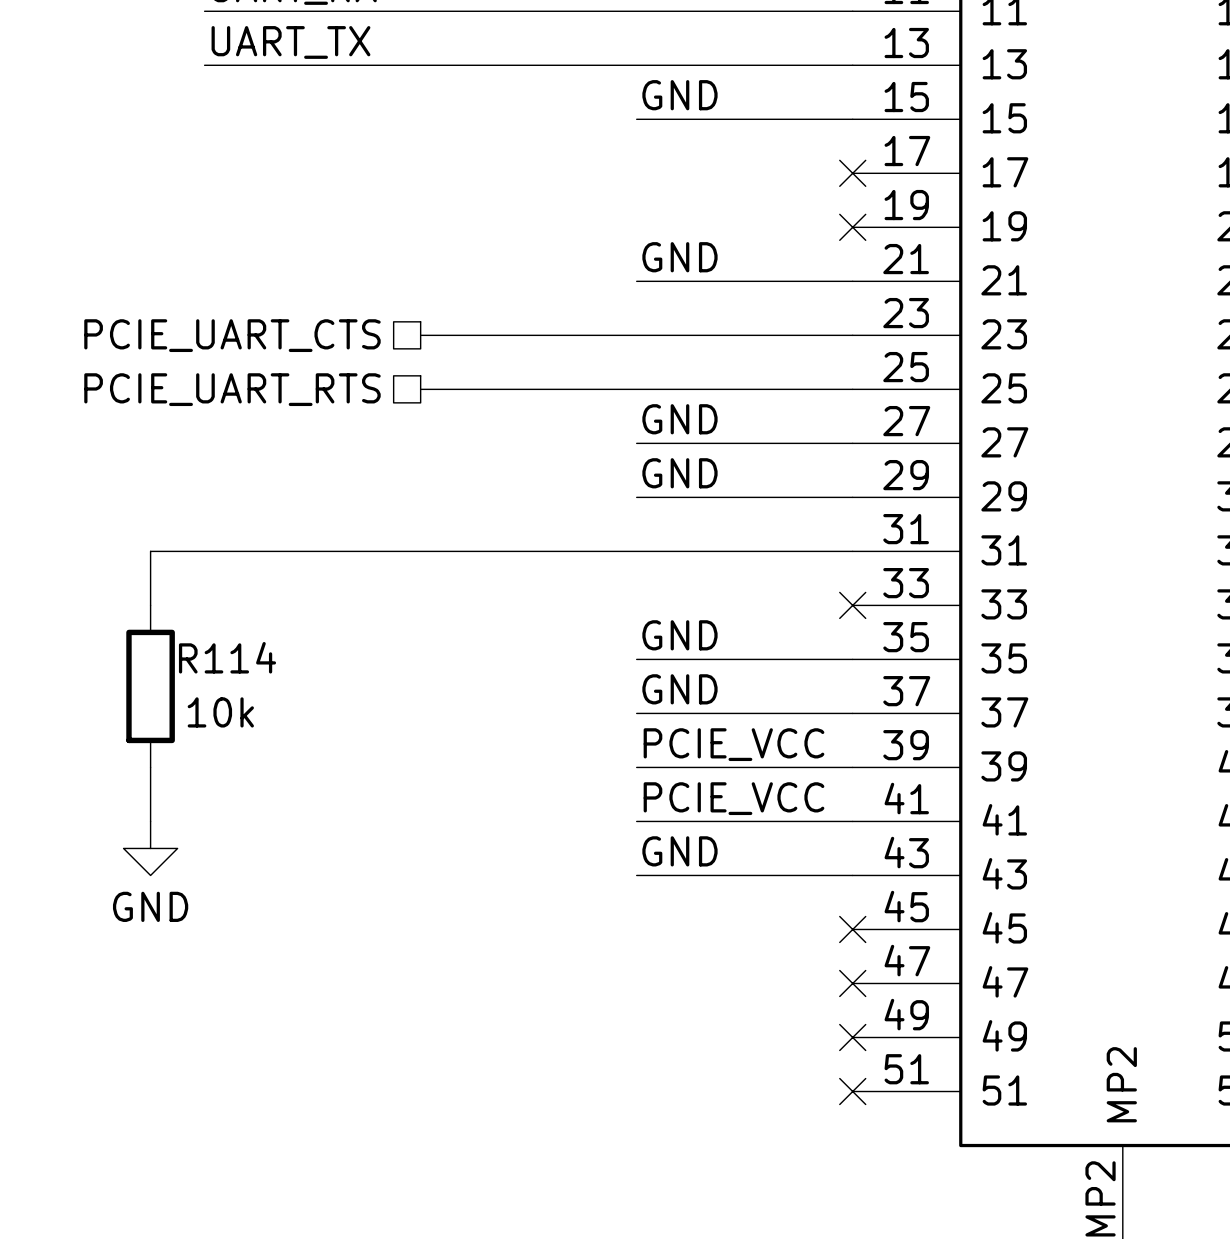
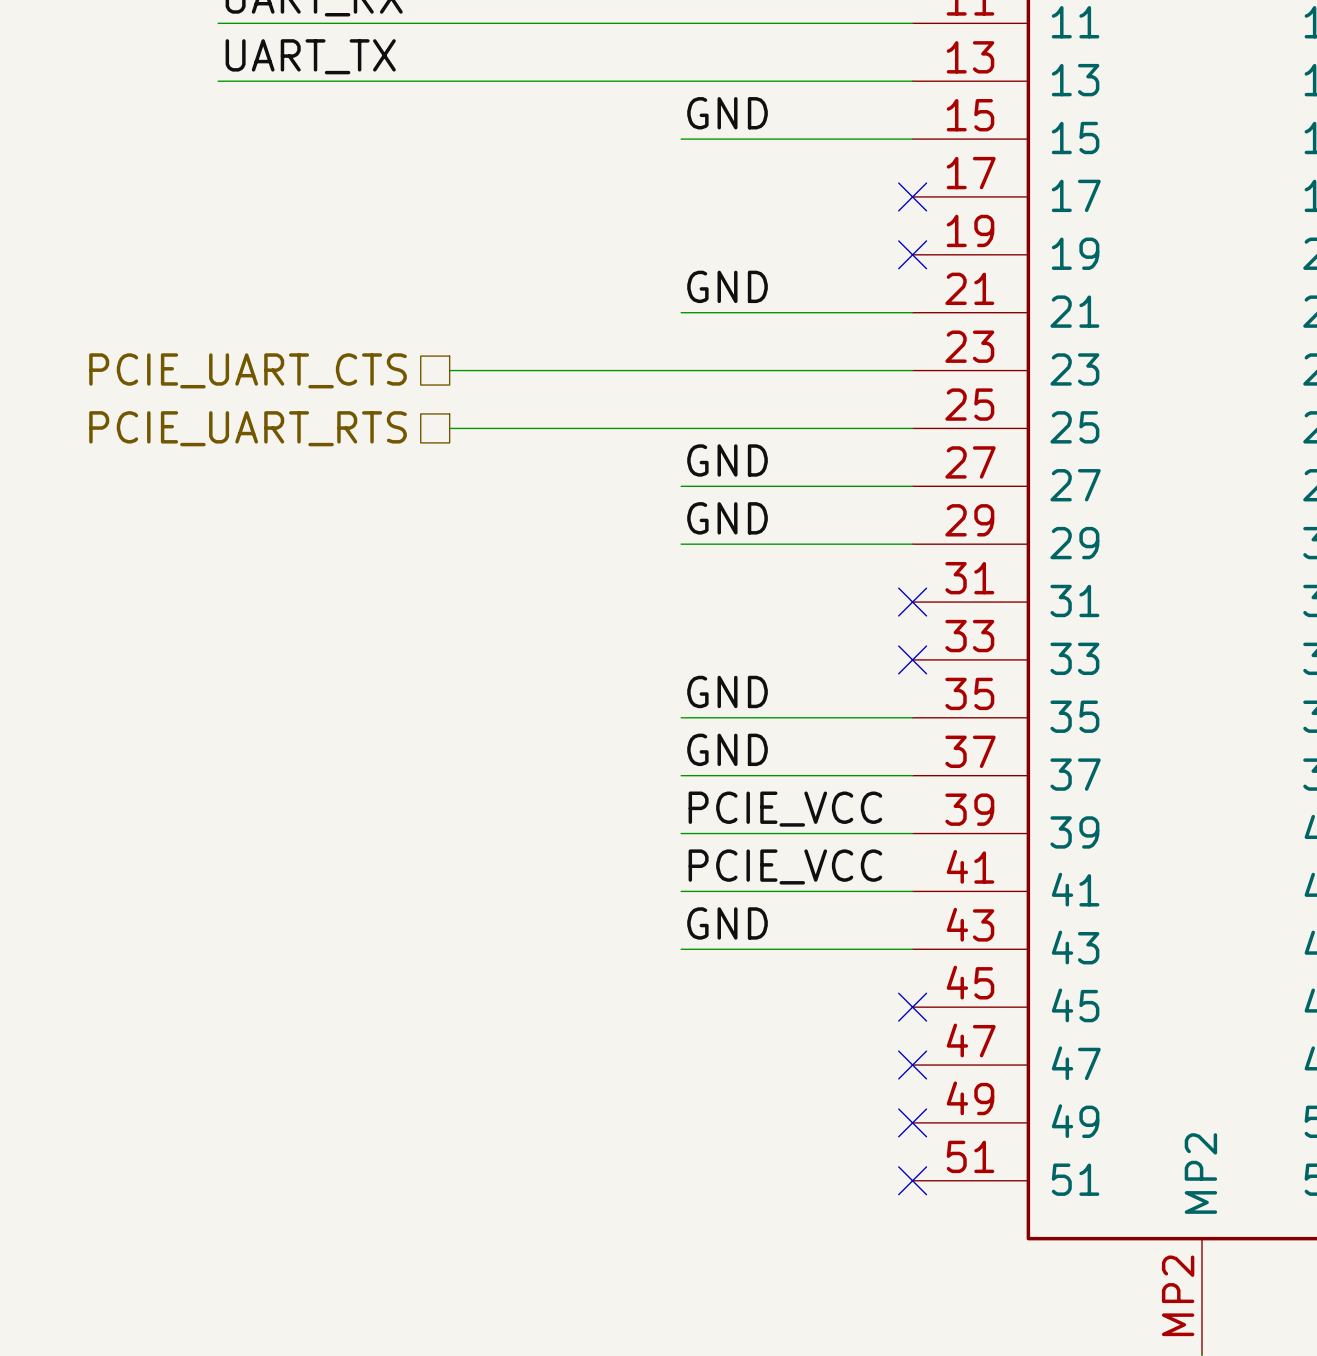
wire: (852, 551) (150, 551) (150, 605) -> none
no-connect mark: none -> (912, 602)
R114: 10k (150, 686) -> none
wire: (150, 767) (150, 821) -> none
power symbol: GND (150, 848) -> none

